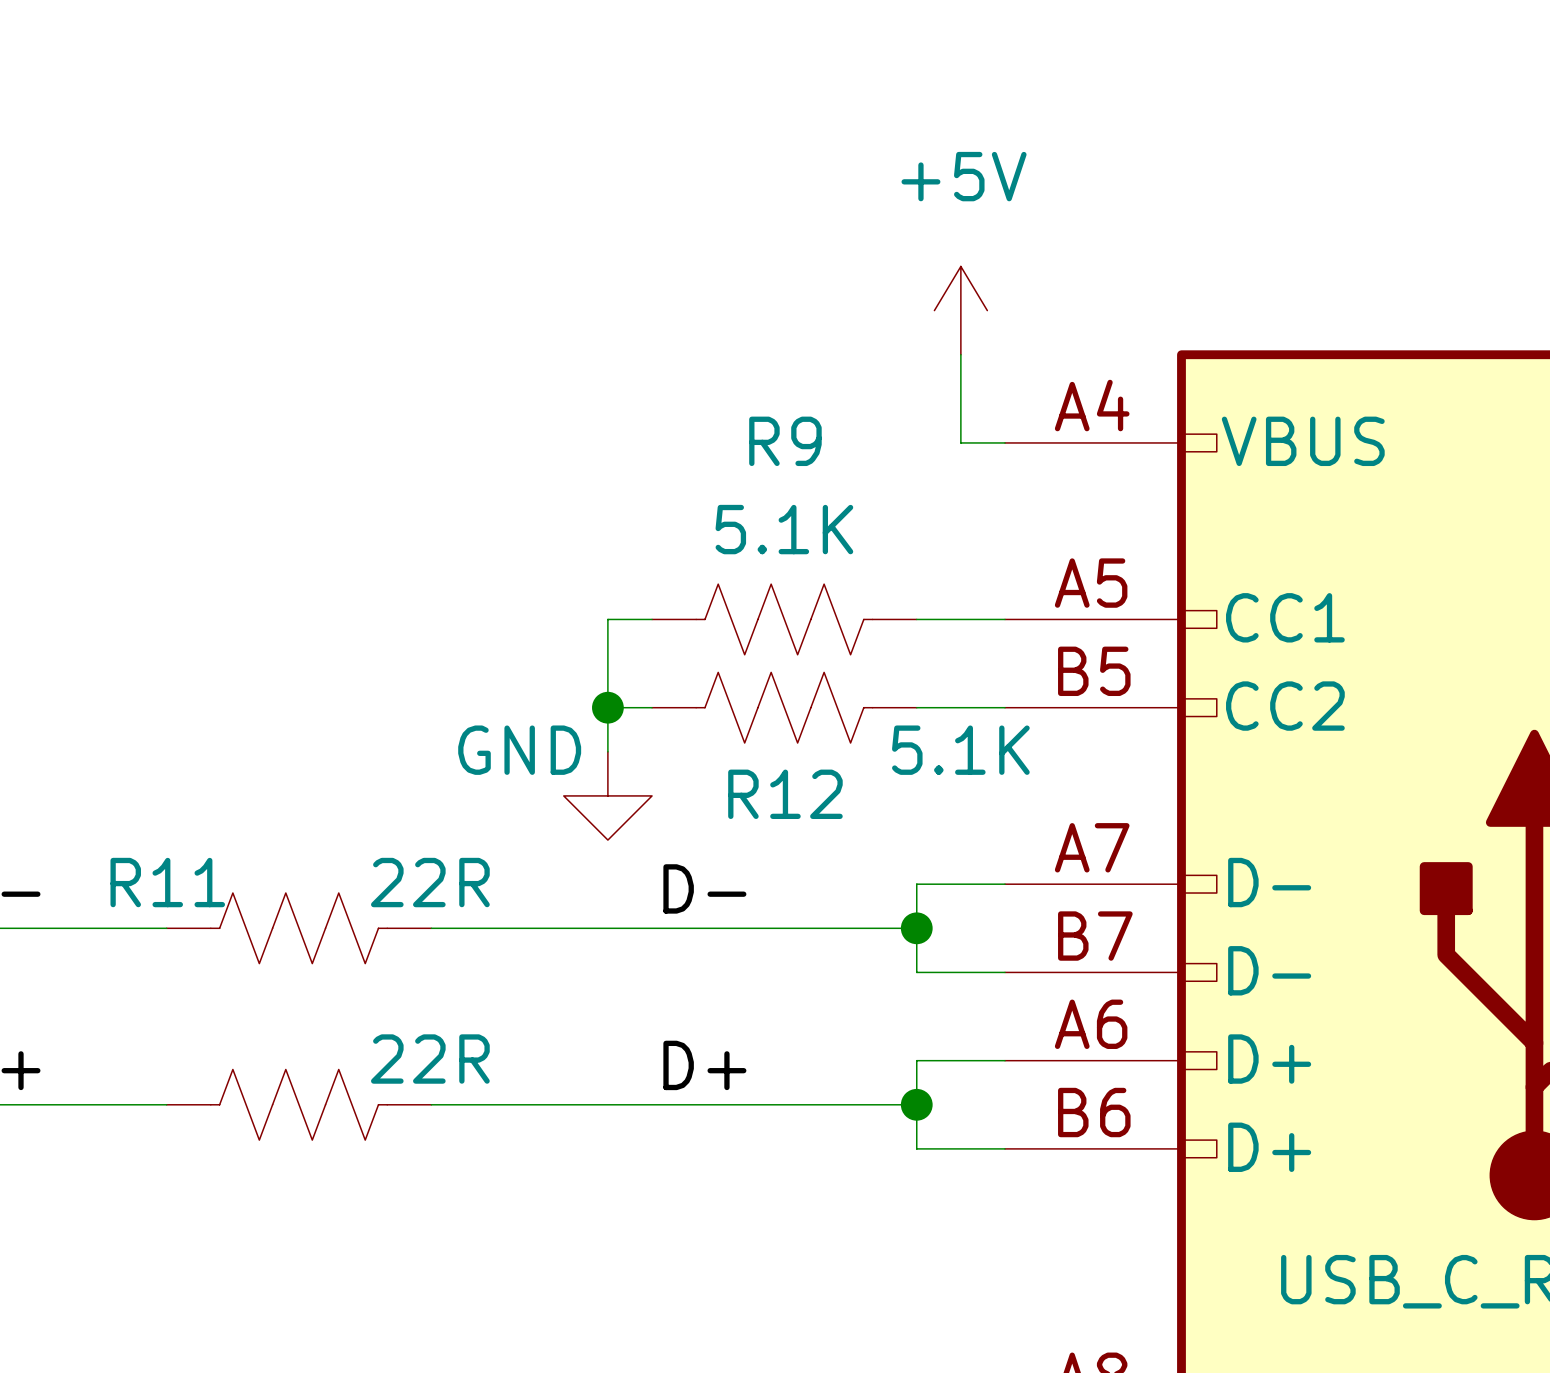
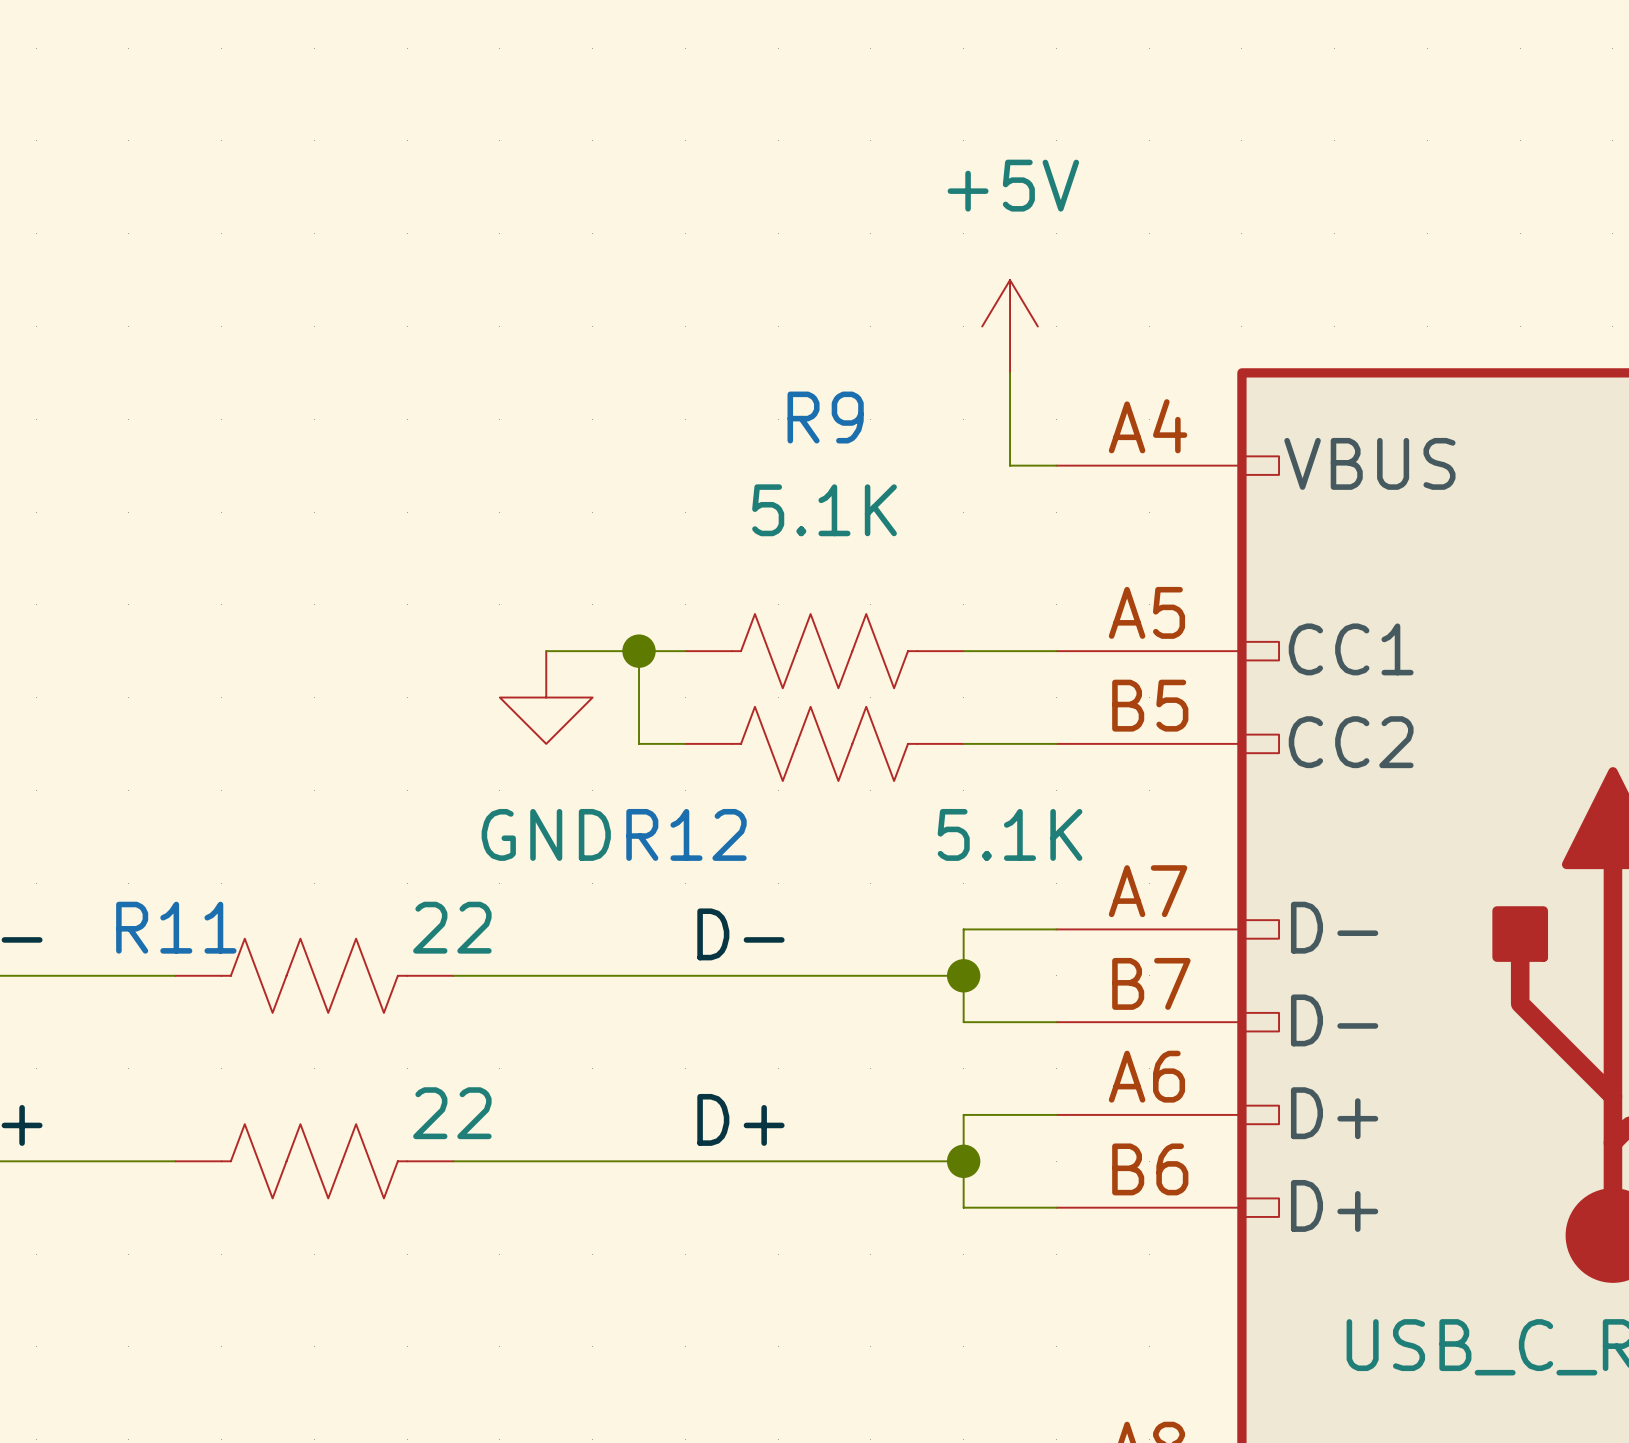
R9 name position: R9 (785, 441) -> R9 (825, 417)
R9 value position: 5.1K (784, 529) -> 5.1K (824, 510)
wire: none -> (546, 651) (639, 651)
wire: (607, 707) (607, 751) -> none
junction position: (607, 707) -> (639, 651)
power symbol text position: GND (519, 750) -> GND (546, 834)
R12 value position: 5.1K (960, 750) -> 5.1K (1010, 834)
R12 name position: R12 (785, 794) -> R12 (686, 834)
power symbol position: GND (607, 795) -> GND (546, 697)
R11 value: 22R (430, 882) -> 22 (452, 927)
part value: 22R (430, 1059) -> 22 (452, 1113)

